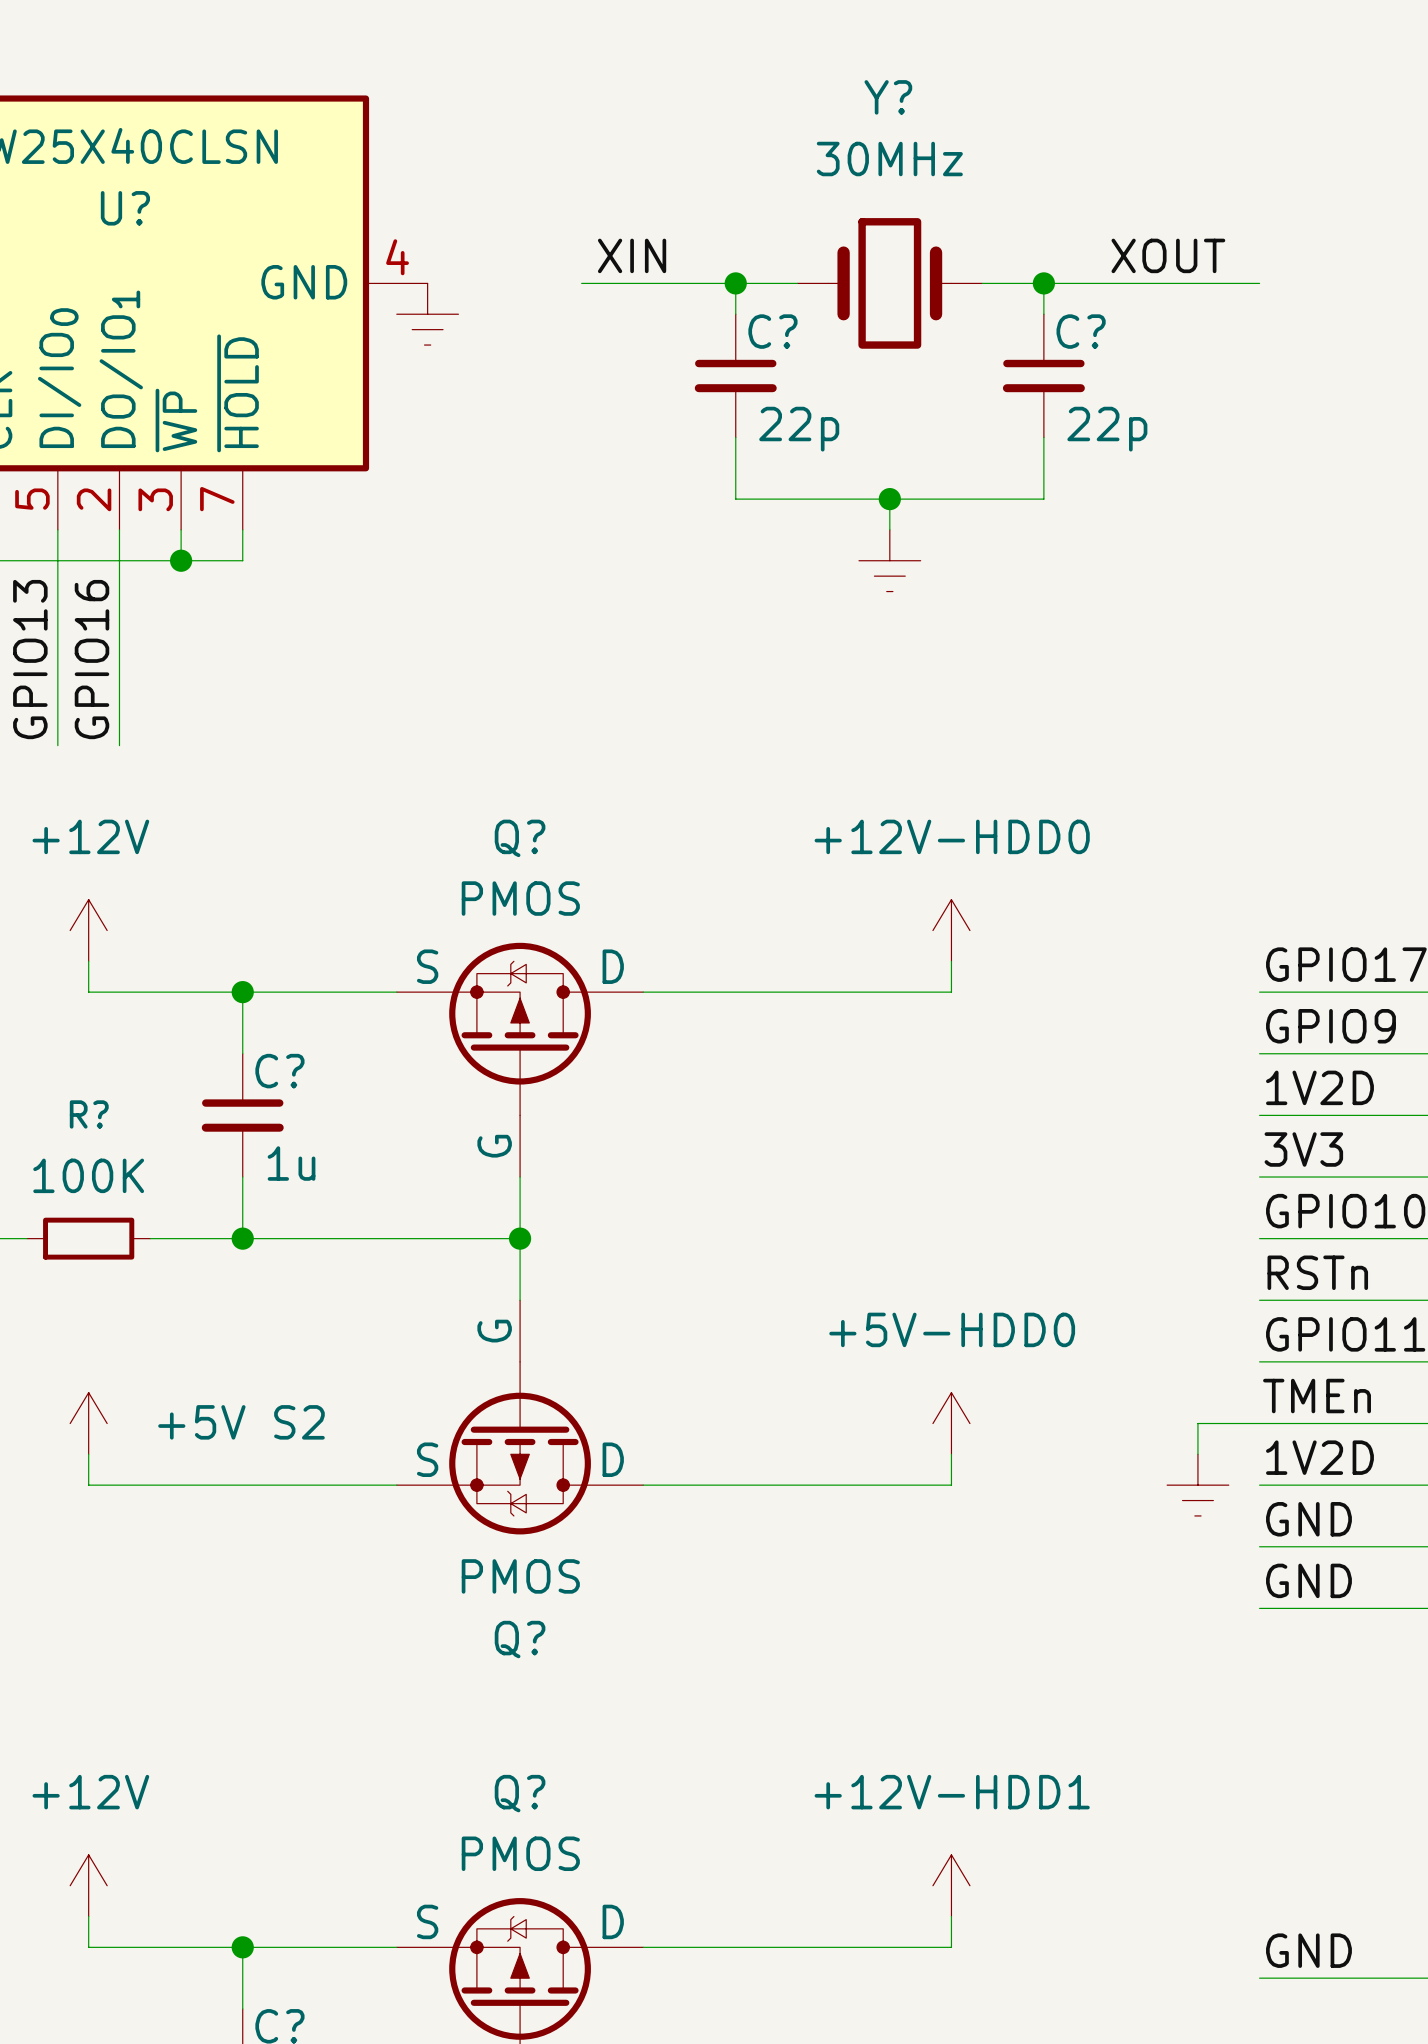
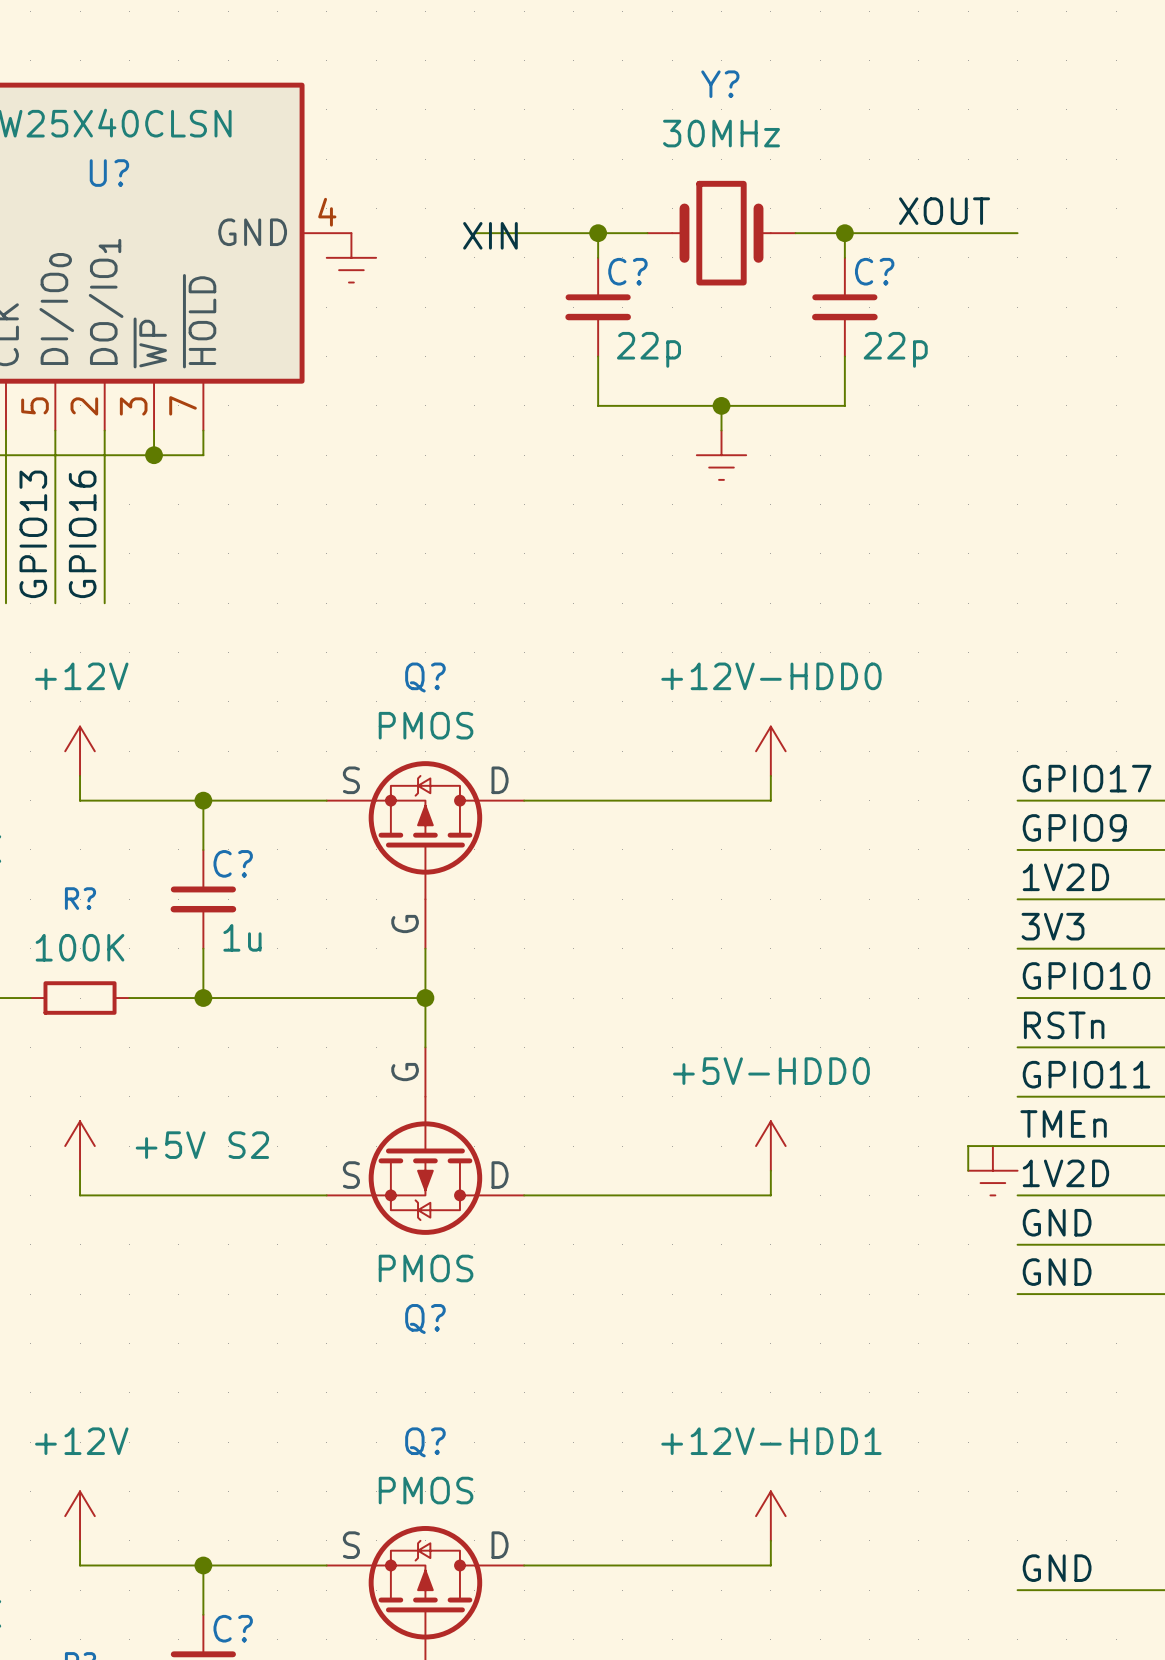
label position: XIN (632, 255) -> XIN (490, 235)
power symbol position: (1197, 1485) -> (992, 1170)

